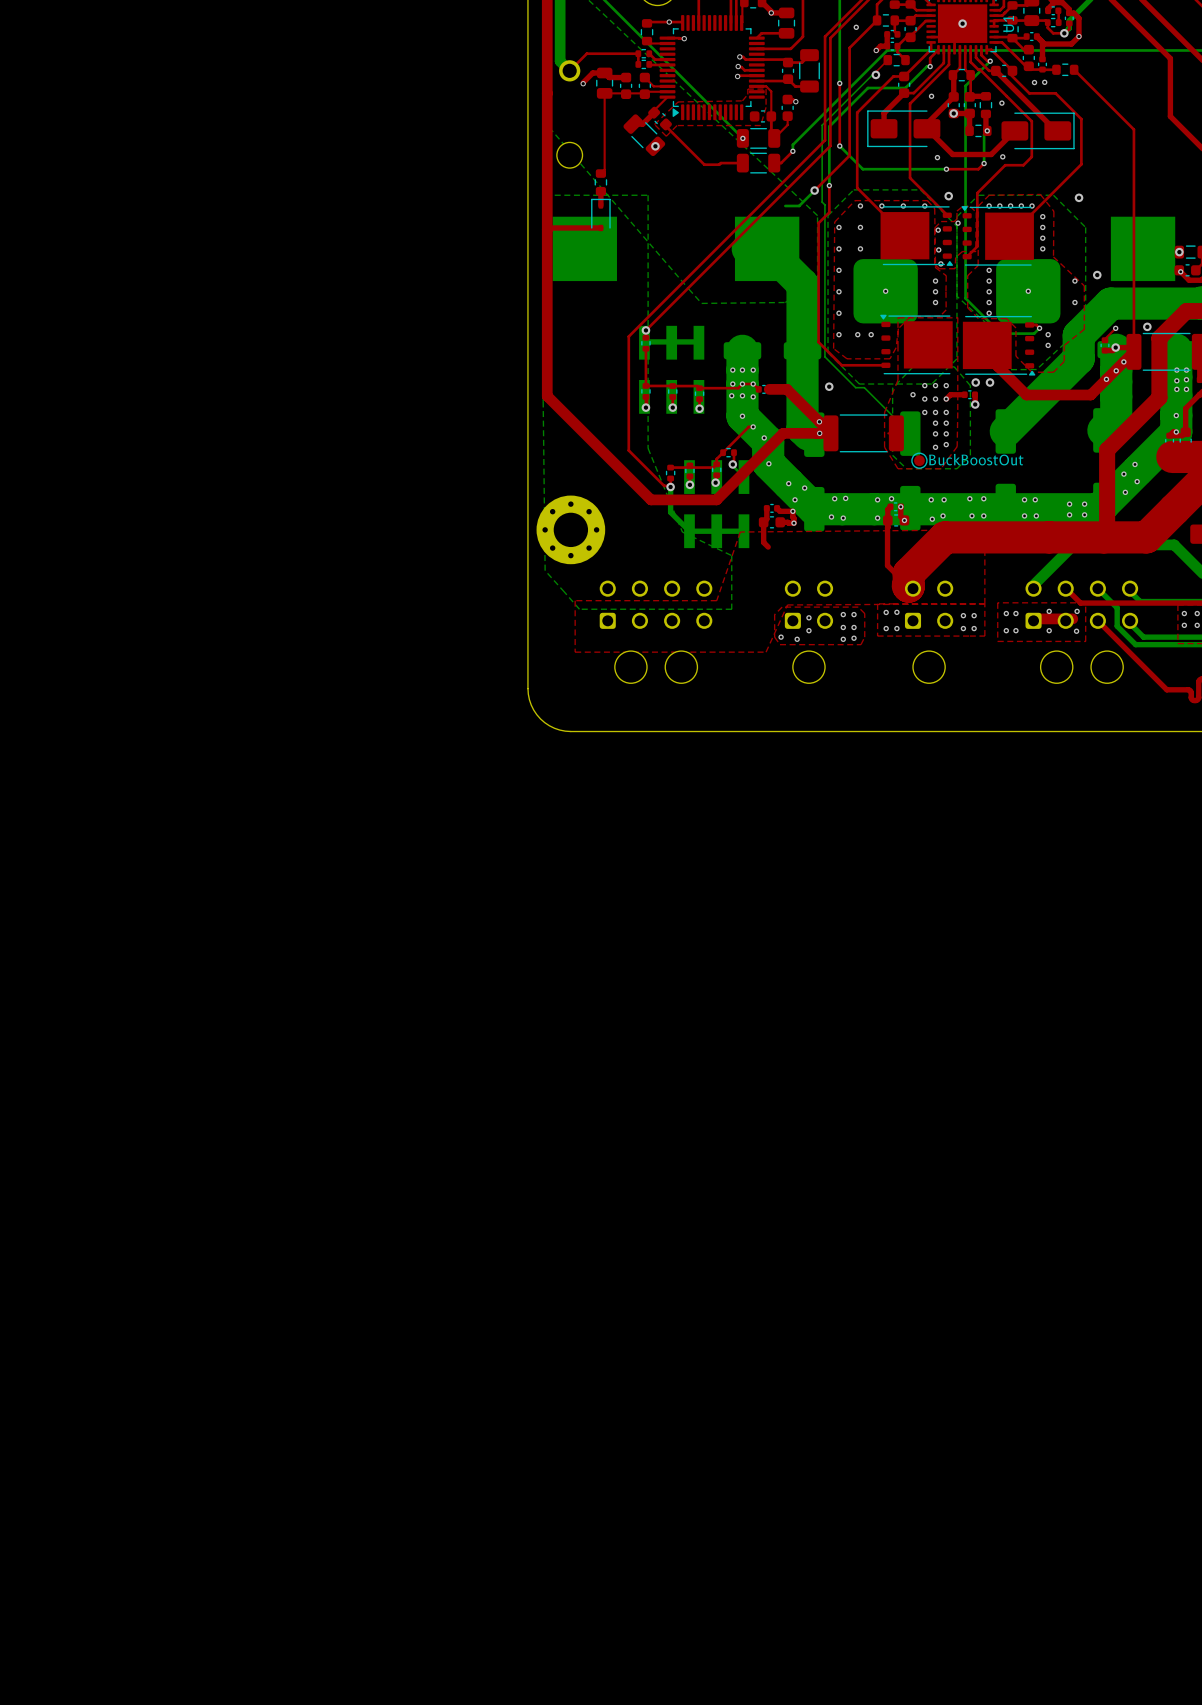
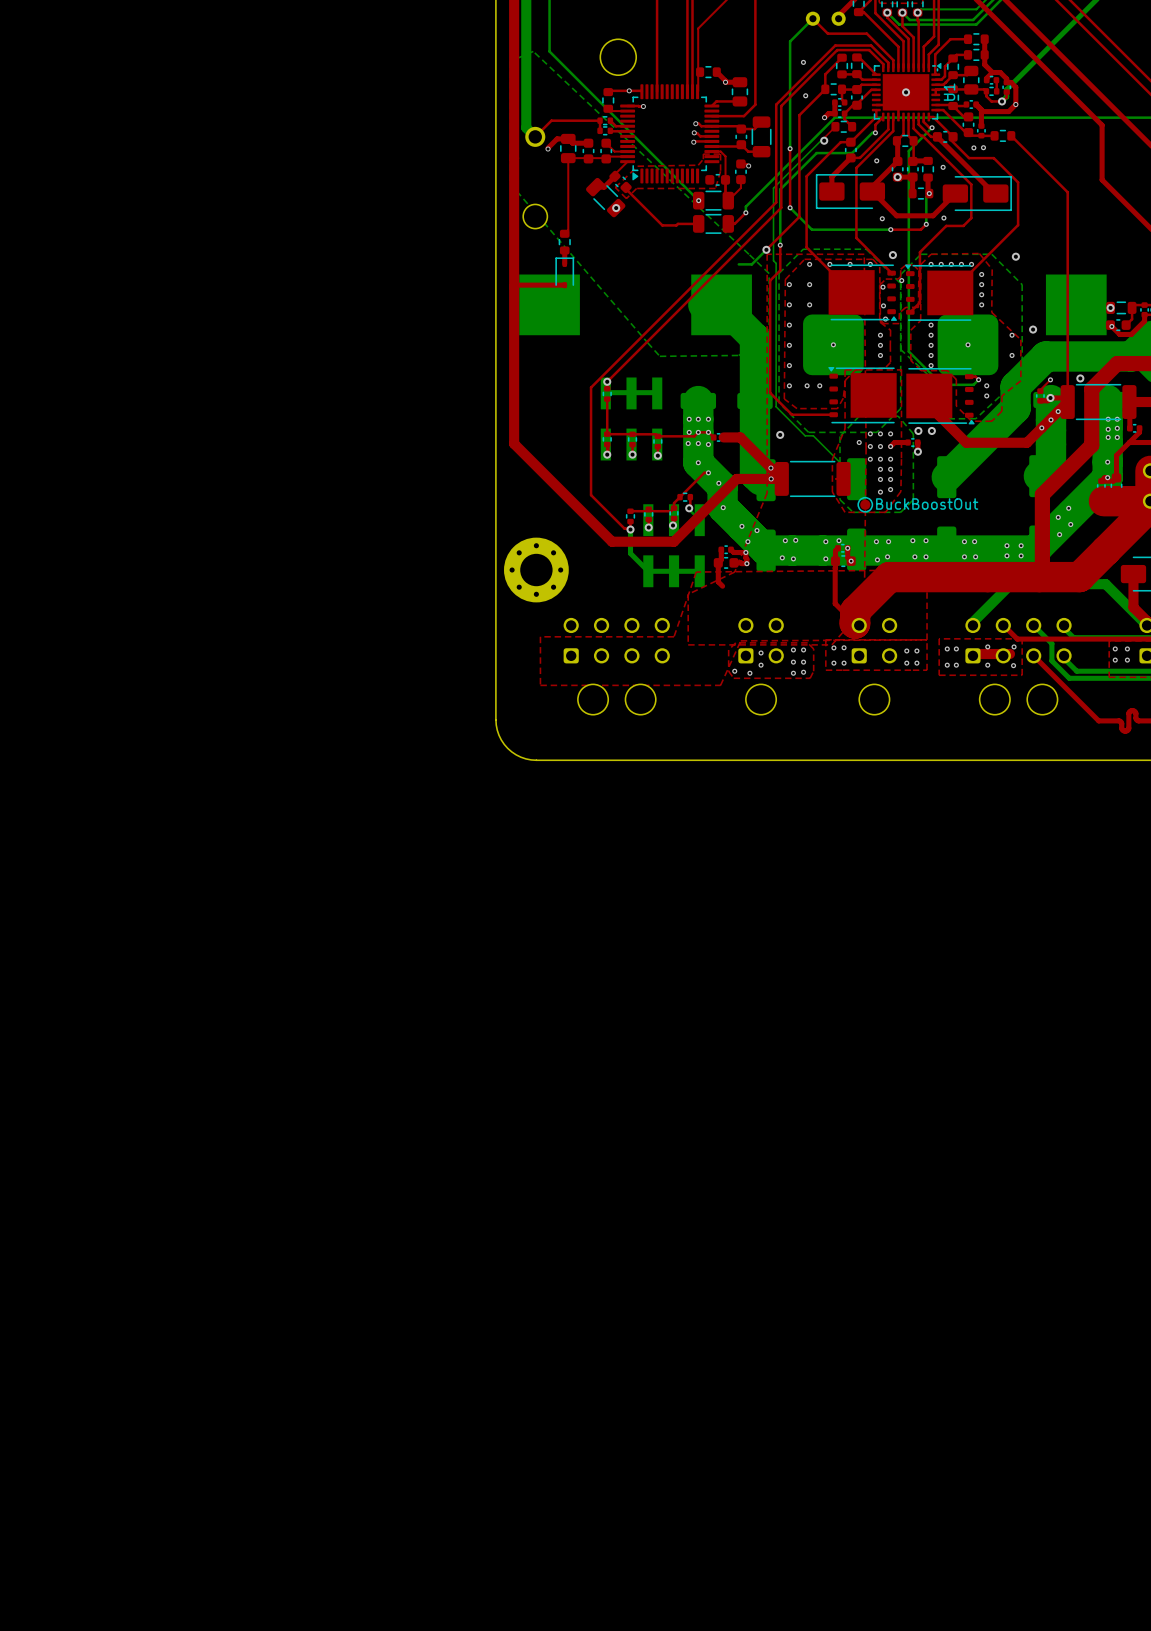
bottom zone outline: (545, 195) (543, 401) (545, 570) (579, 609) (731, 609) (731, 555) (682, 532) (648, 448) (648, 195) (545, 195) -> none
top zone outline: none -> (767, 254) (864, 254) (866, 448) (864, 608) (831, 644) (688, 644) (688, 594) (734, 572) (767, 493) (767, 254)

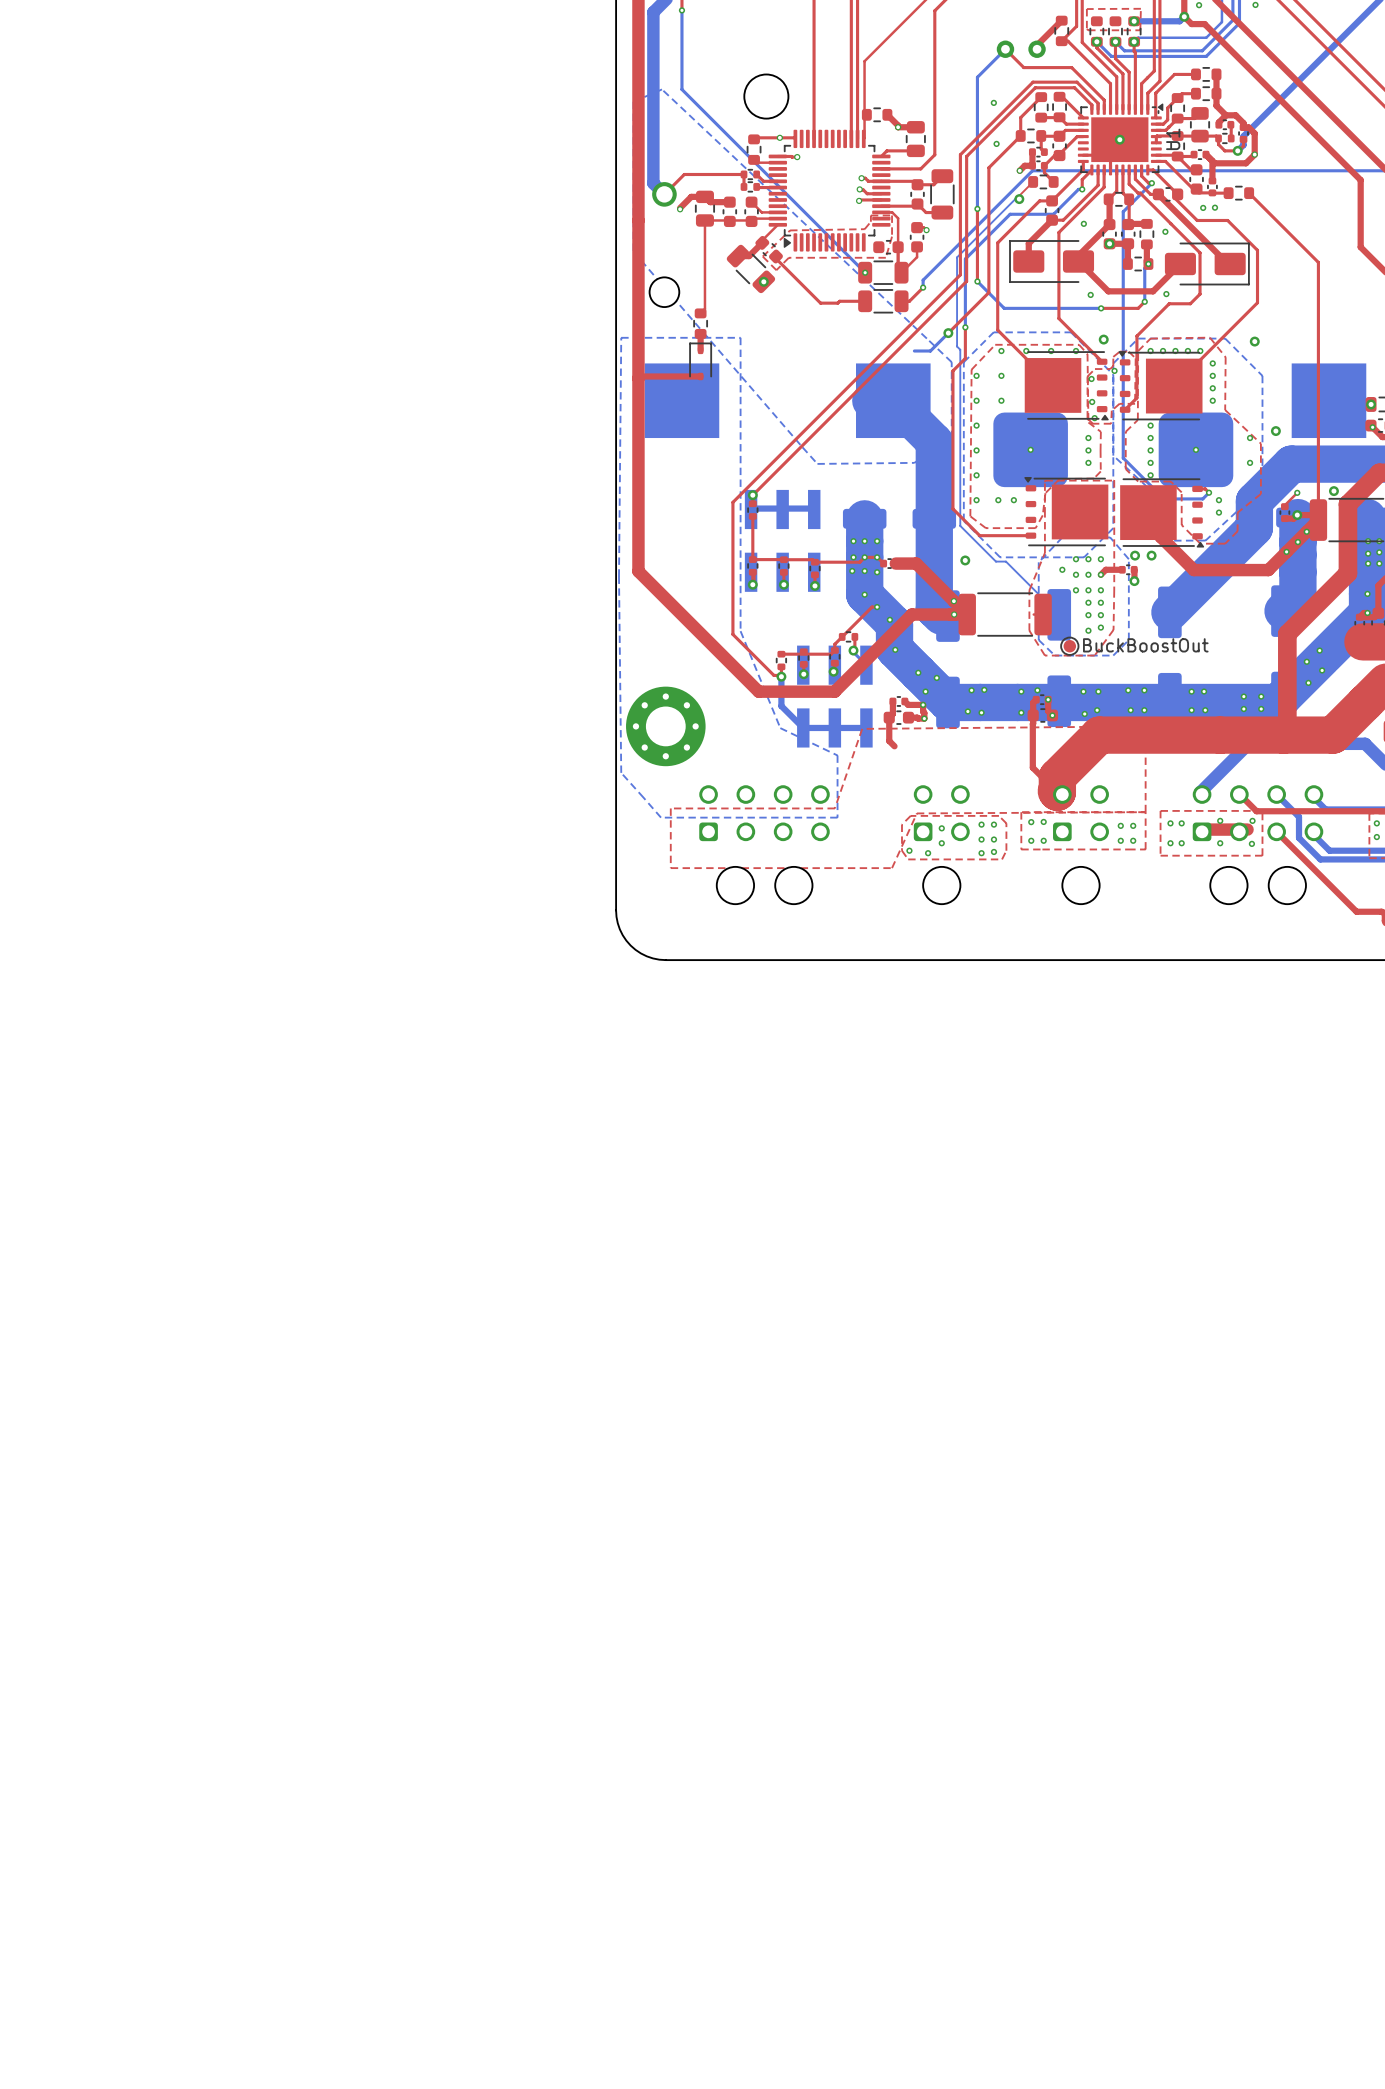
bottom zone outline: none -> (621, 337) (618, 576) (621, 772) (661, 817) (837, 817) (837, 755) (780, 728) (740, 631) (740, 337) (621, 337)
top zone outline: (767, 254) (864, 254) (866, 448) (864, 608) (831, 644) (688, 644) (688, 594) (734, 572) (767, 493) (767, 254) -> none

